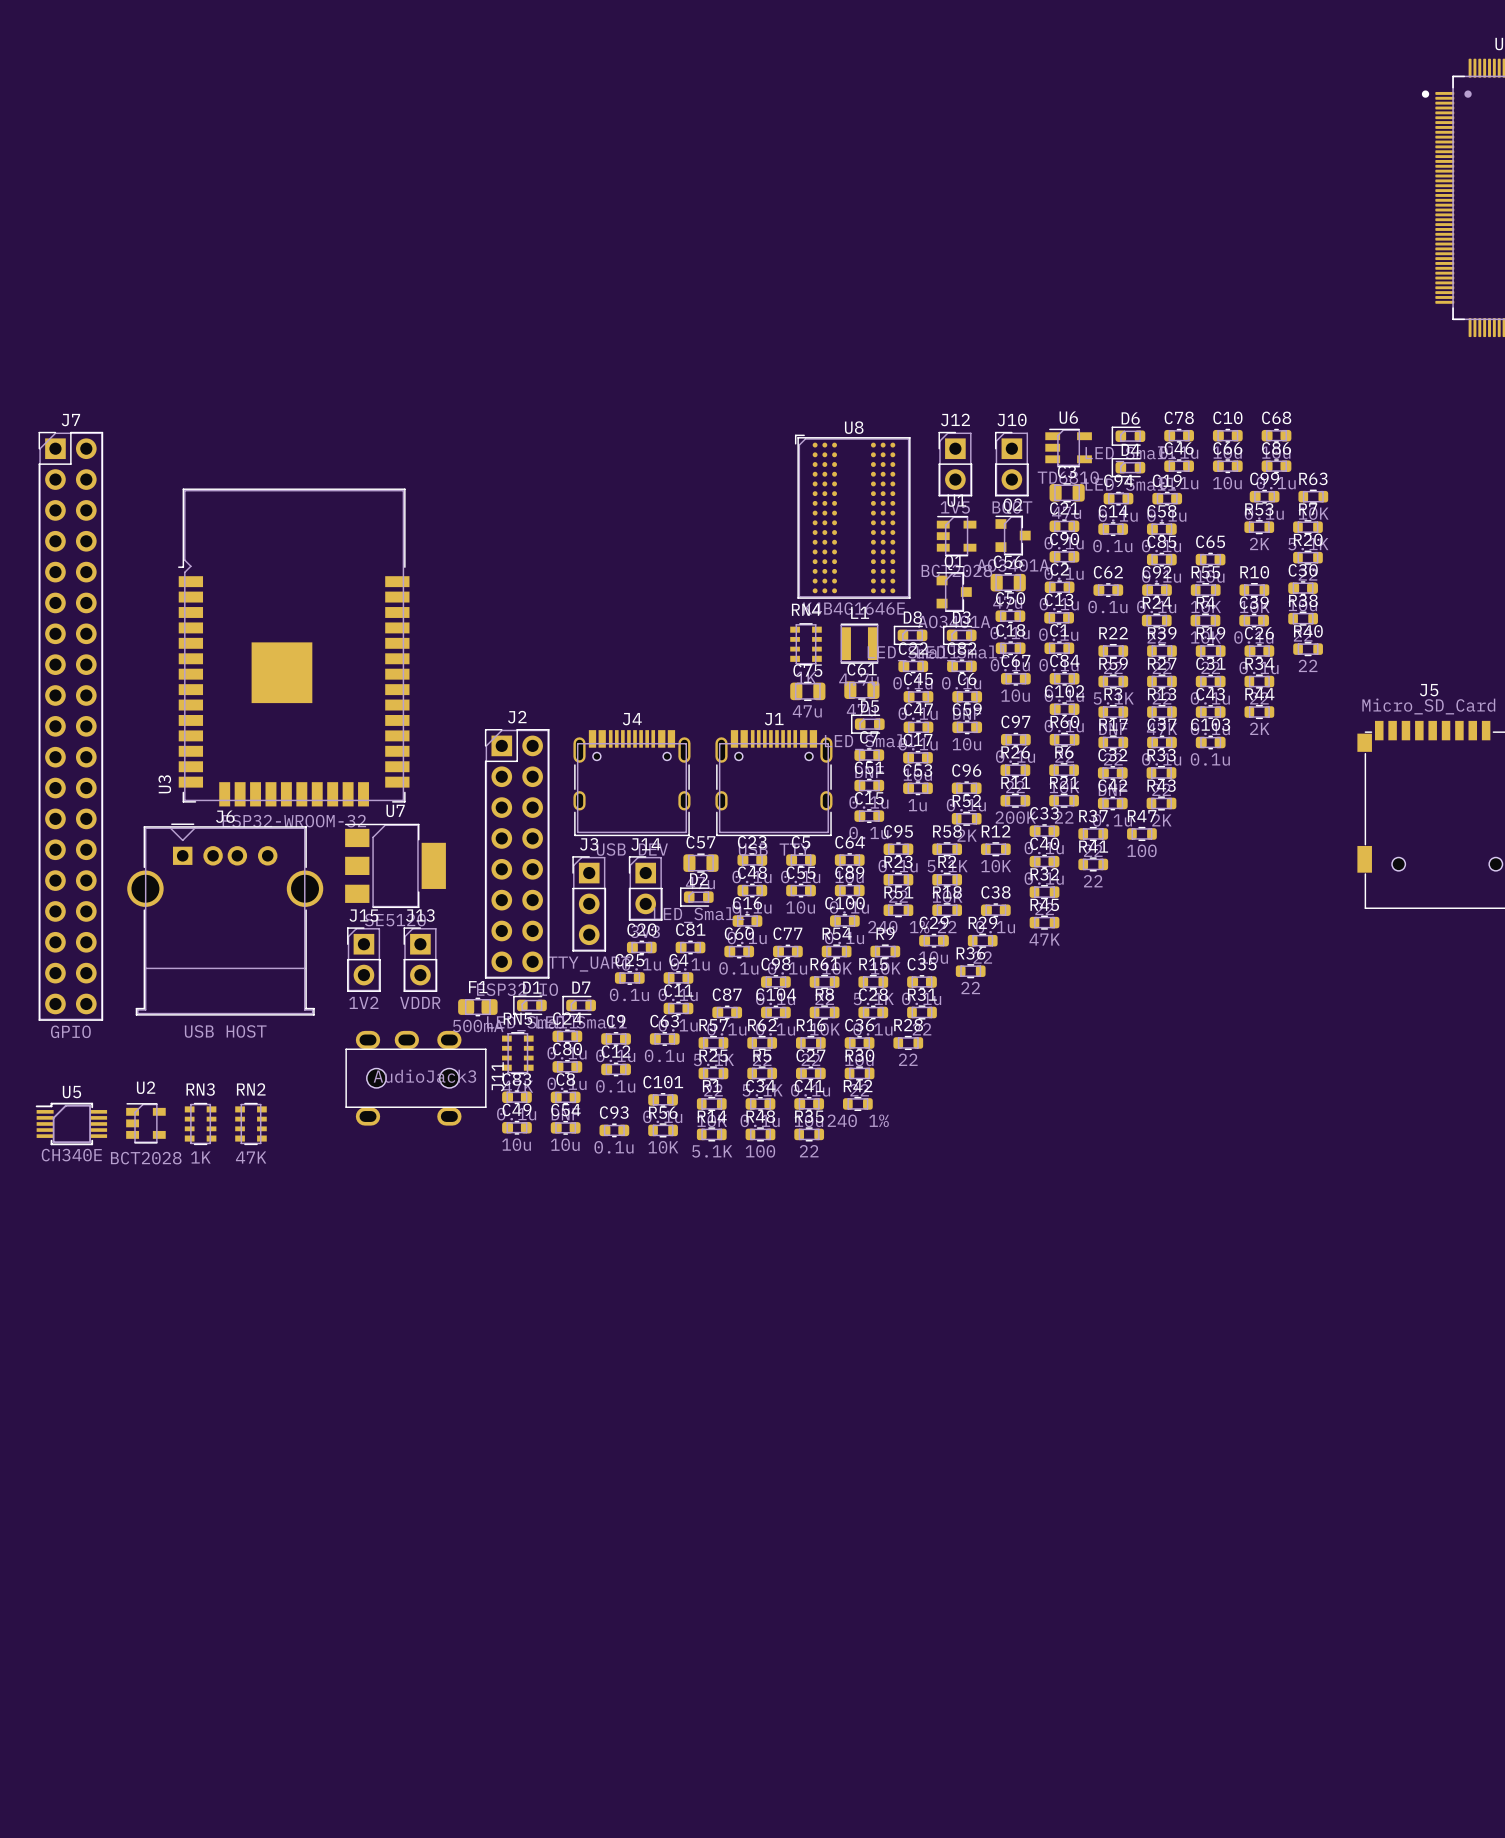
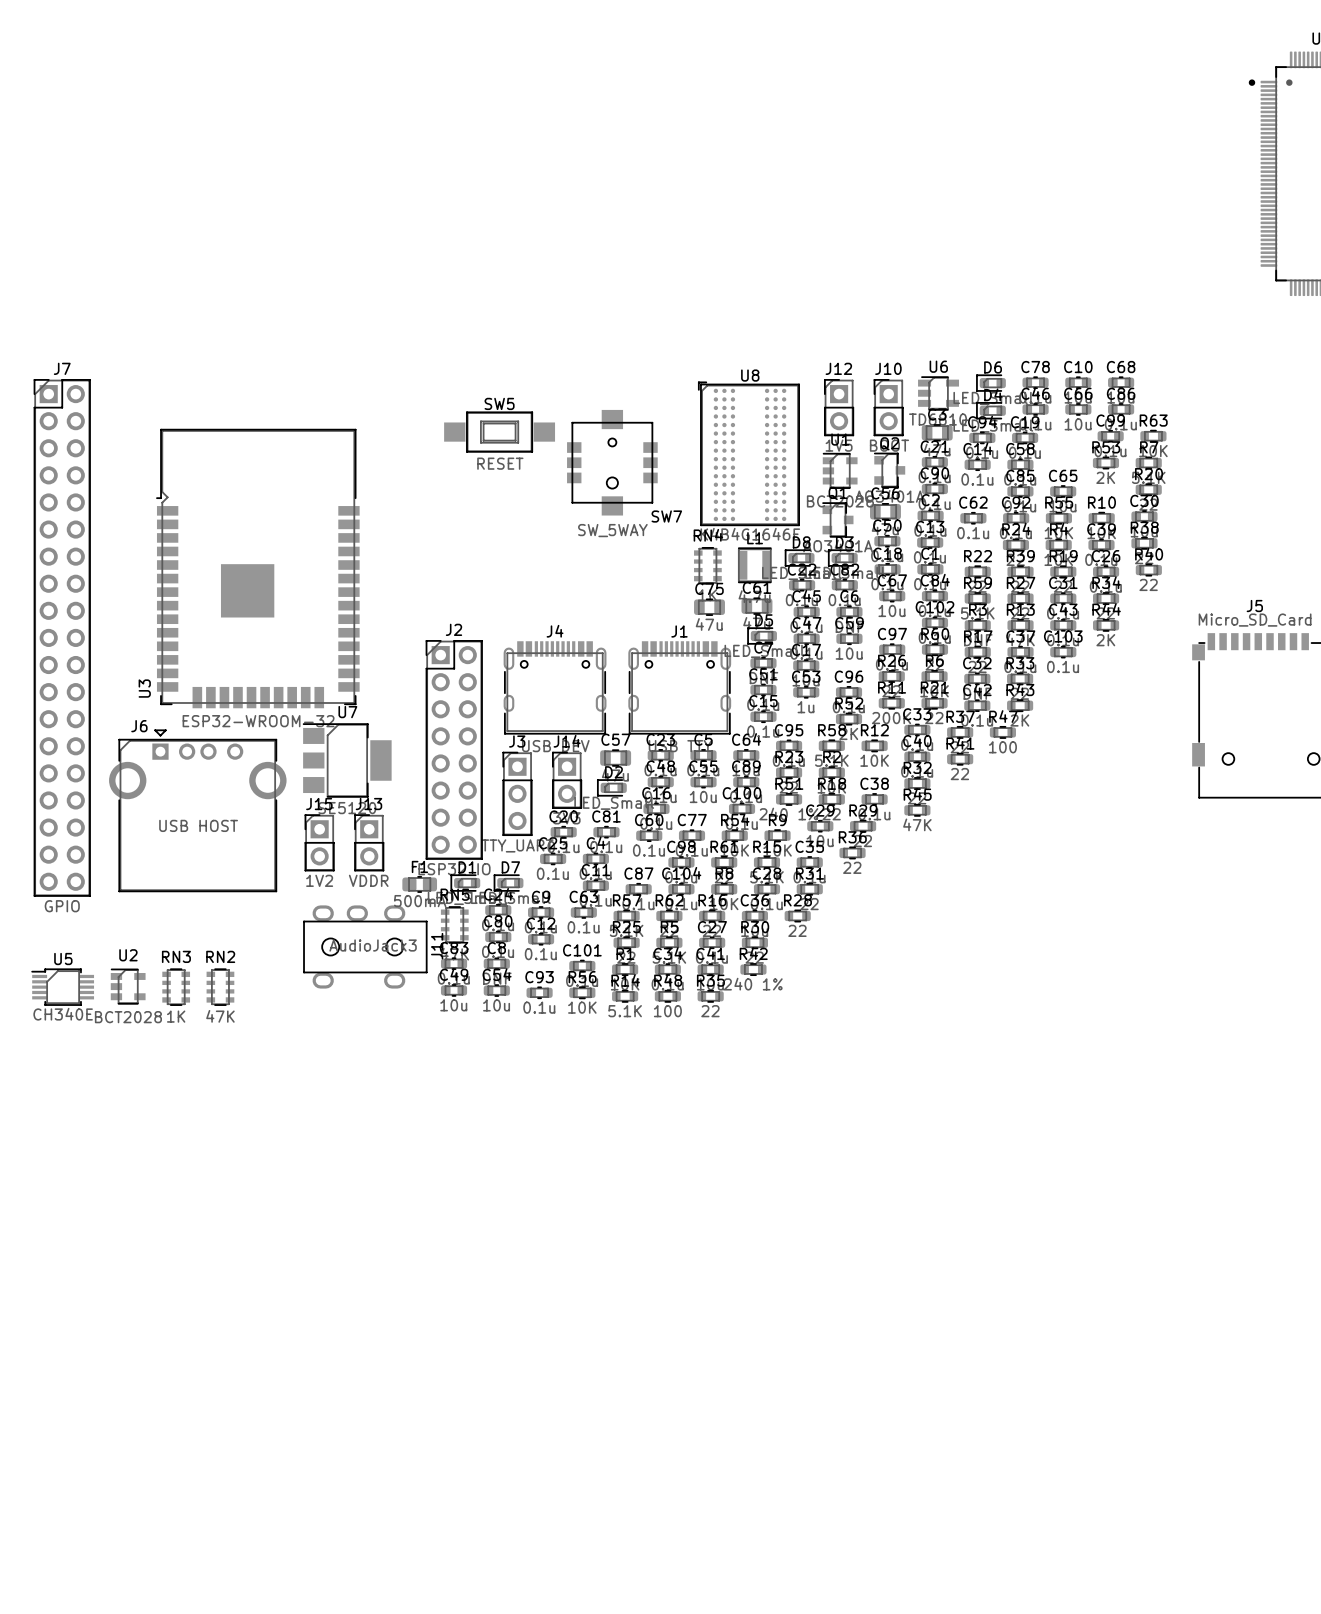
SW5: none -> RESET (499, 432)
SW7: none -> SW_5WAY (612, 462)
J6 name position: J6 (225, 816) -> J6 (139, 726)
J6 footprint: [127, 823, 324, 1016] -> [109, 729, 287, 893]
J6 value position: USB HOST (225, 1031) -> USB HOST (198, 825)

